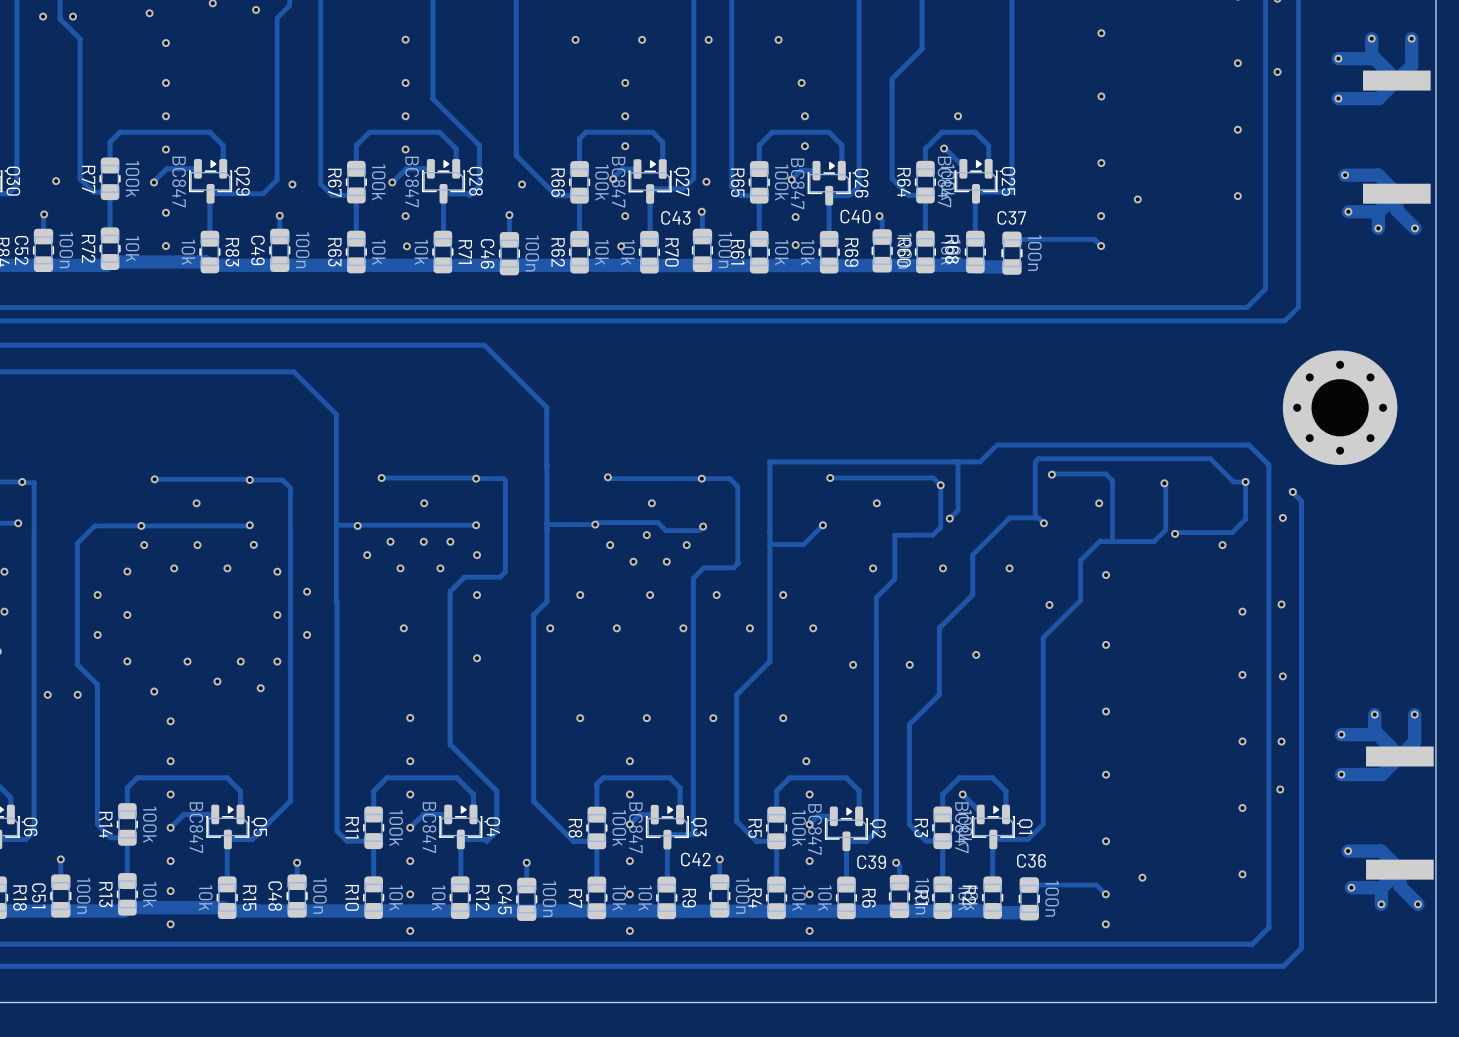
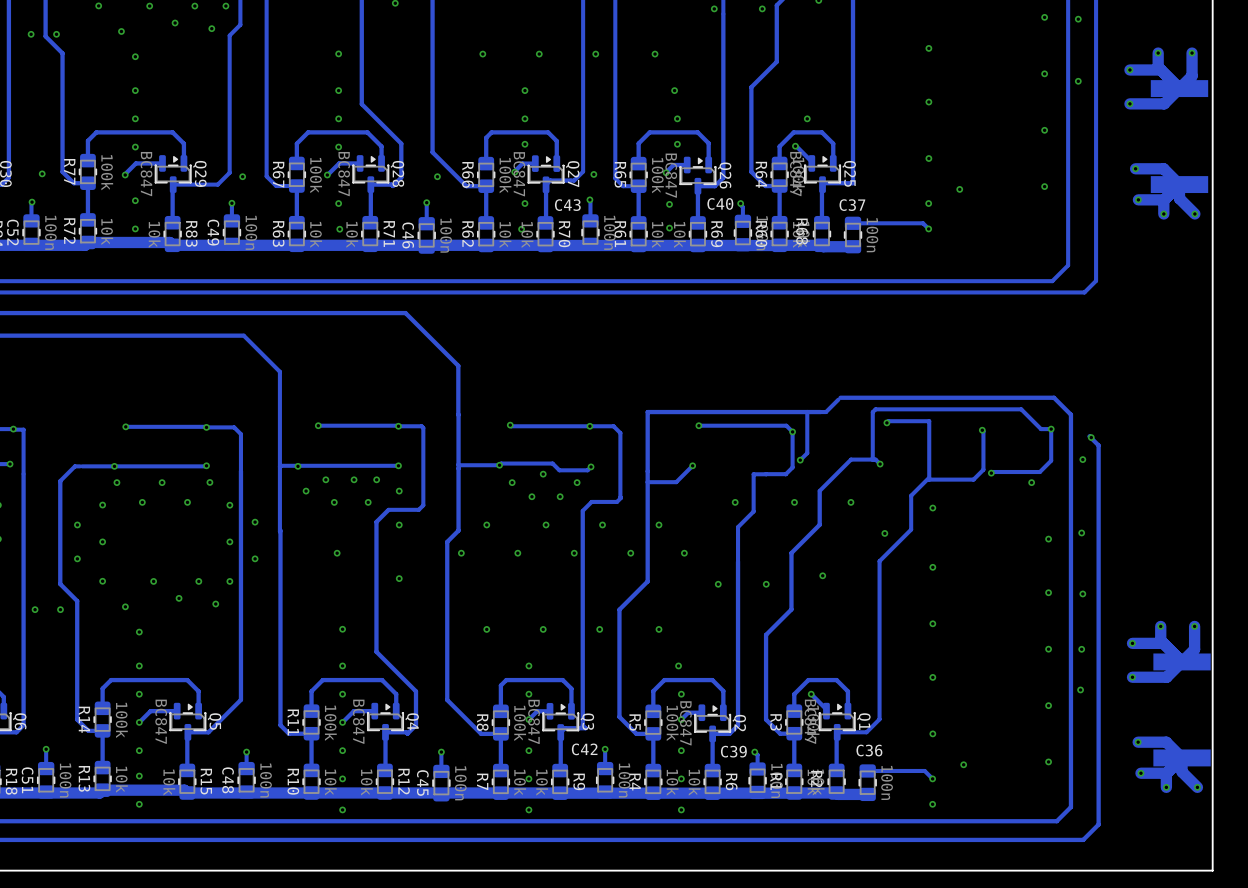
part: (1340, 407) -> none
track: none -> (888, 421) (929, 421) (929, 479)
track: (1052, 474) (1105, 474) (1112, 480) (1112, 541) -> none
via: (196, 503) -> none
via: (424, 503) -> none
via: (651, 503) -> none
via: (876, 503) -> none
via: (1099, 503) -> none

